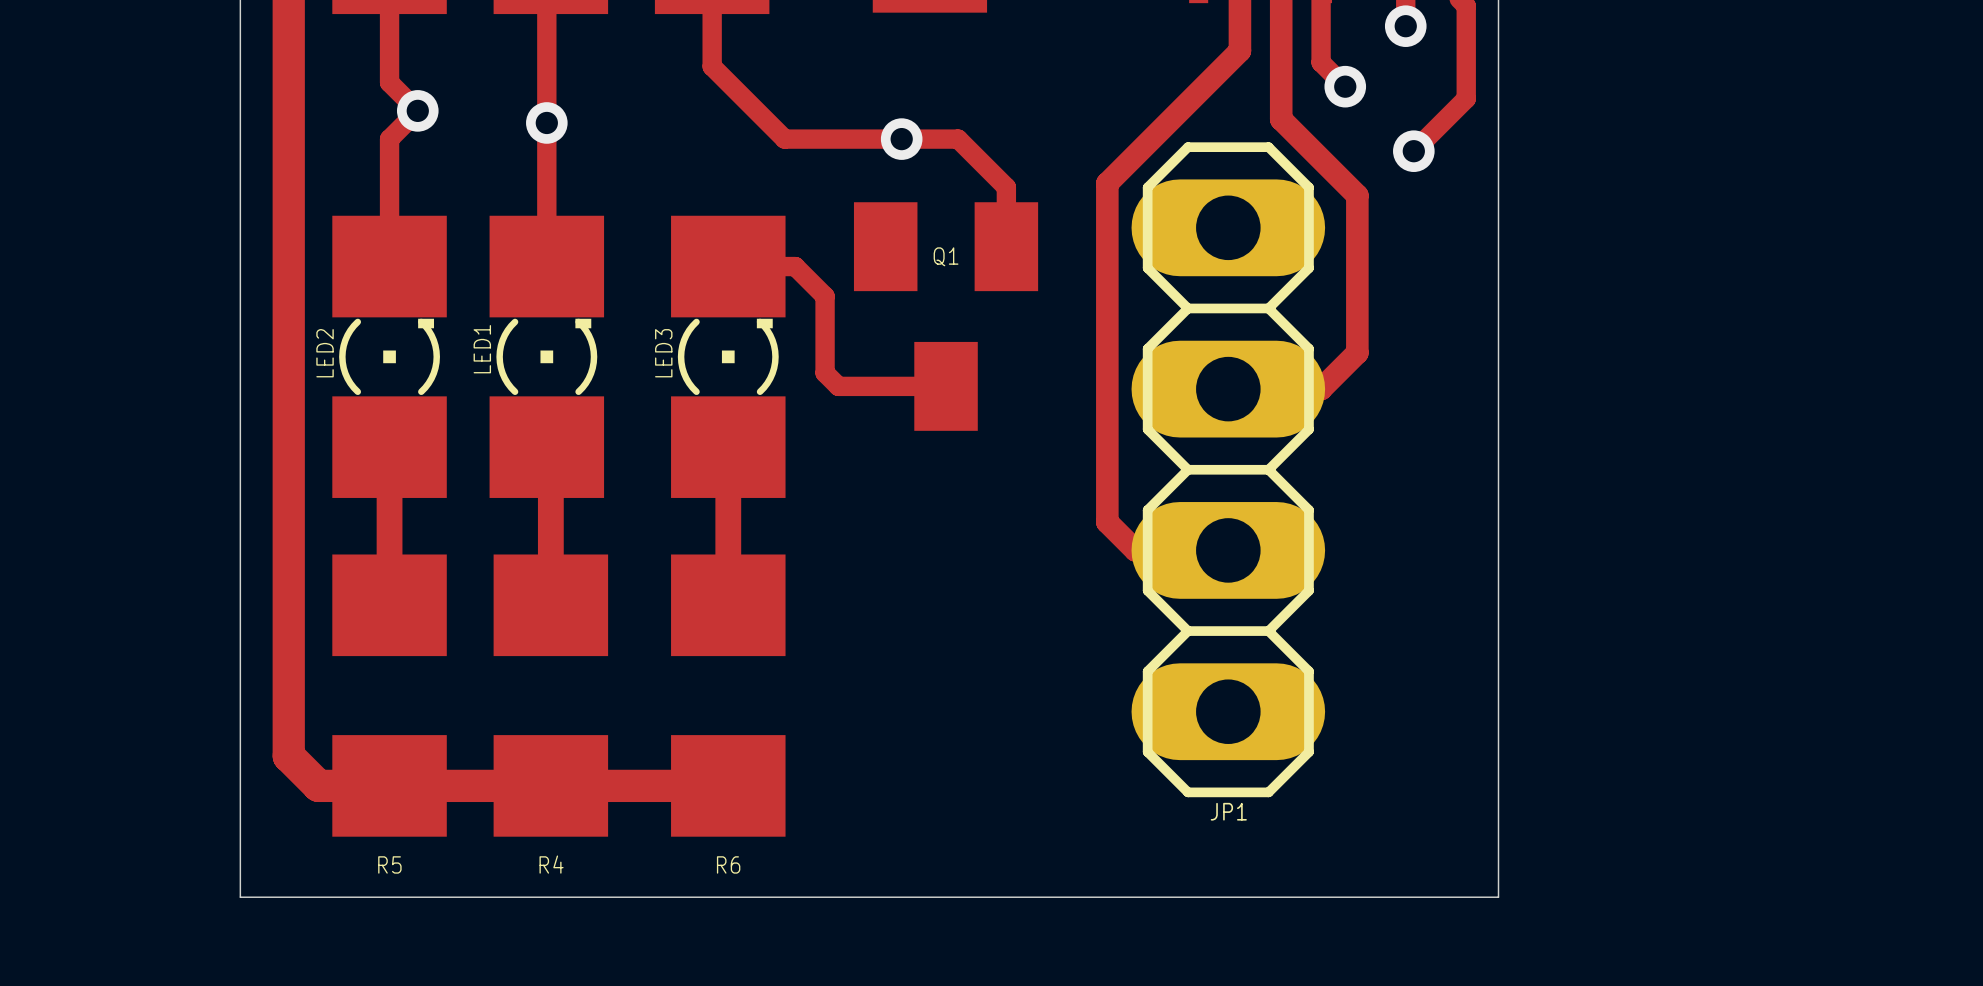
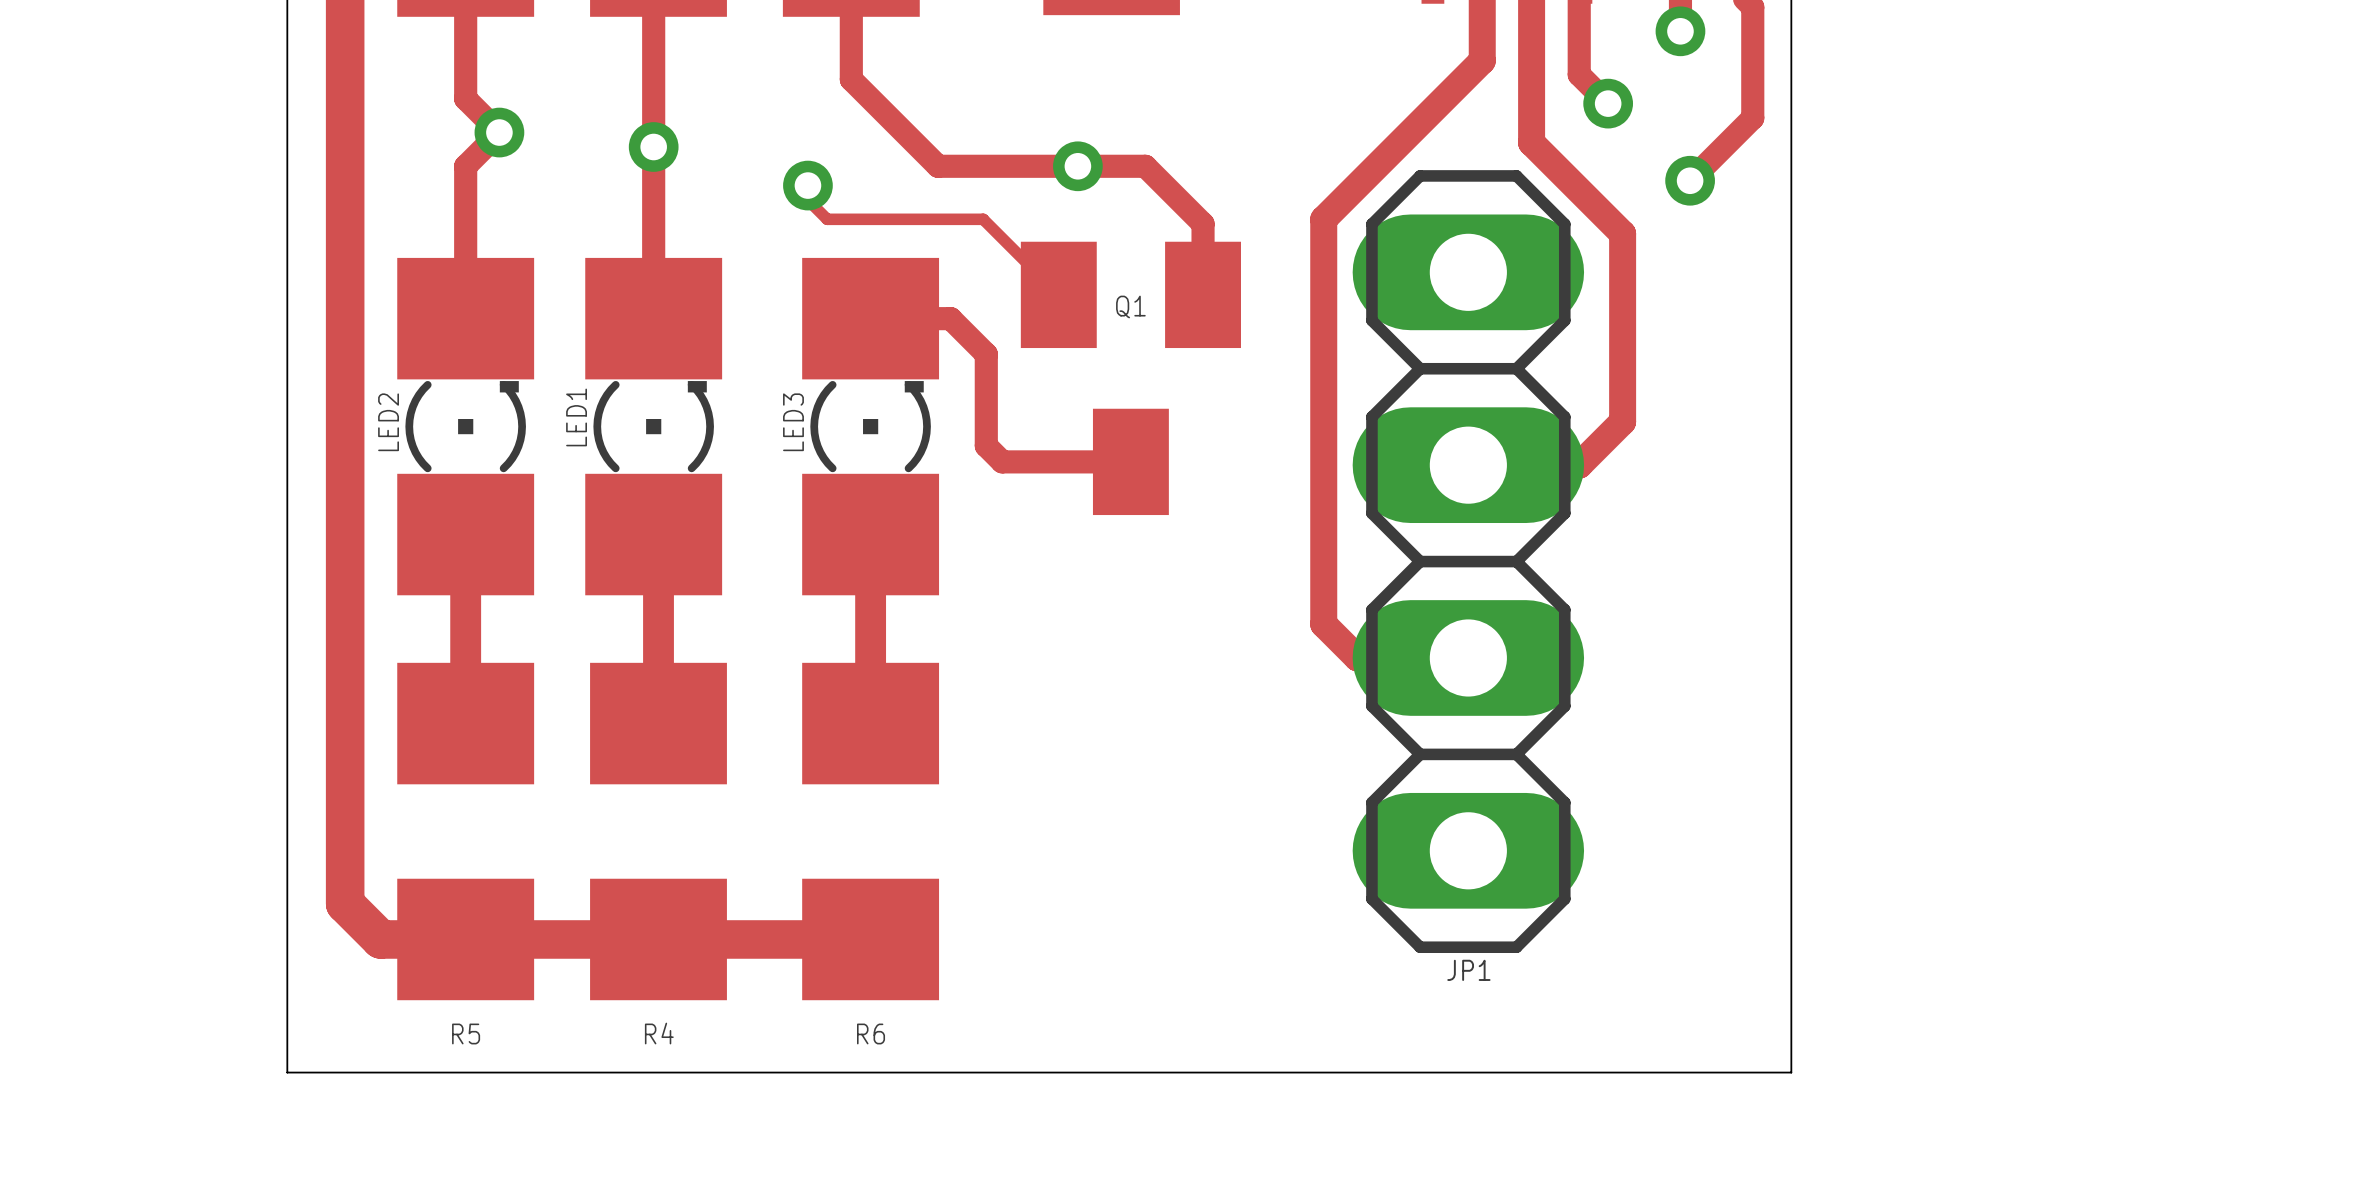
track: none -> (807, 185) (807, 200) (827, 219) (983, 219) (1058, 294)
via: none -> (807, 185)

